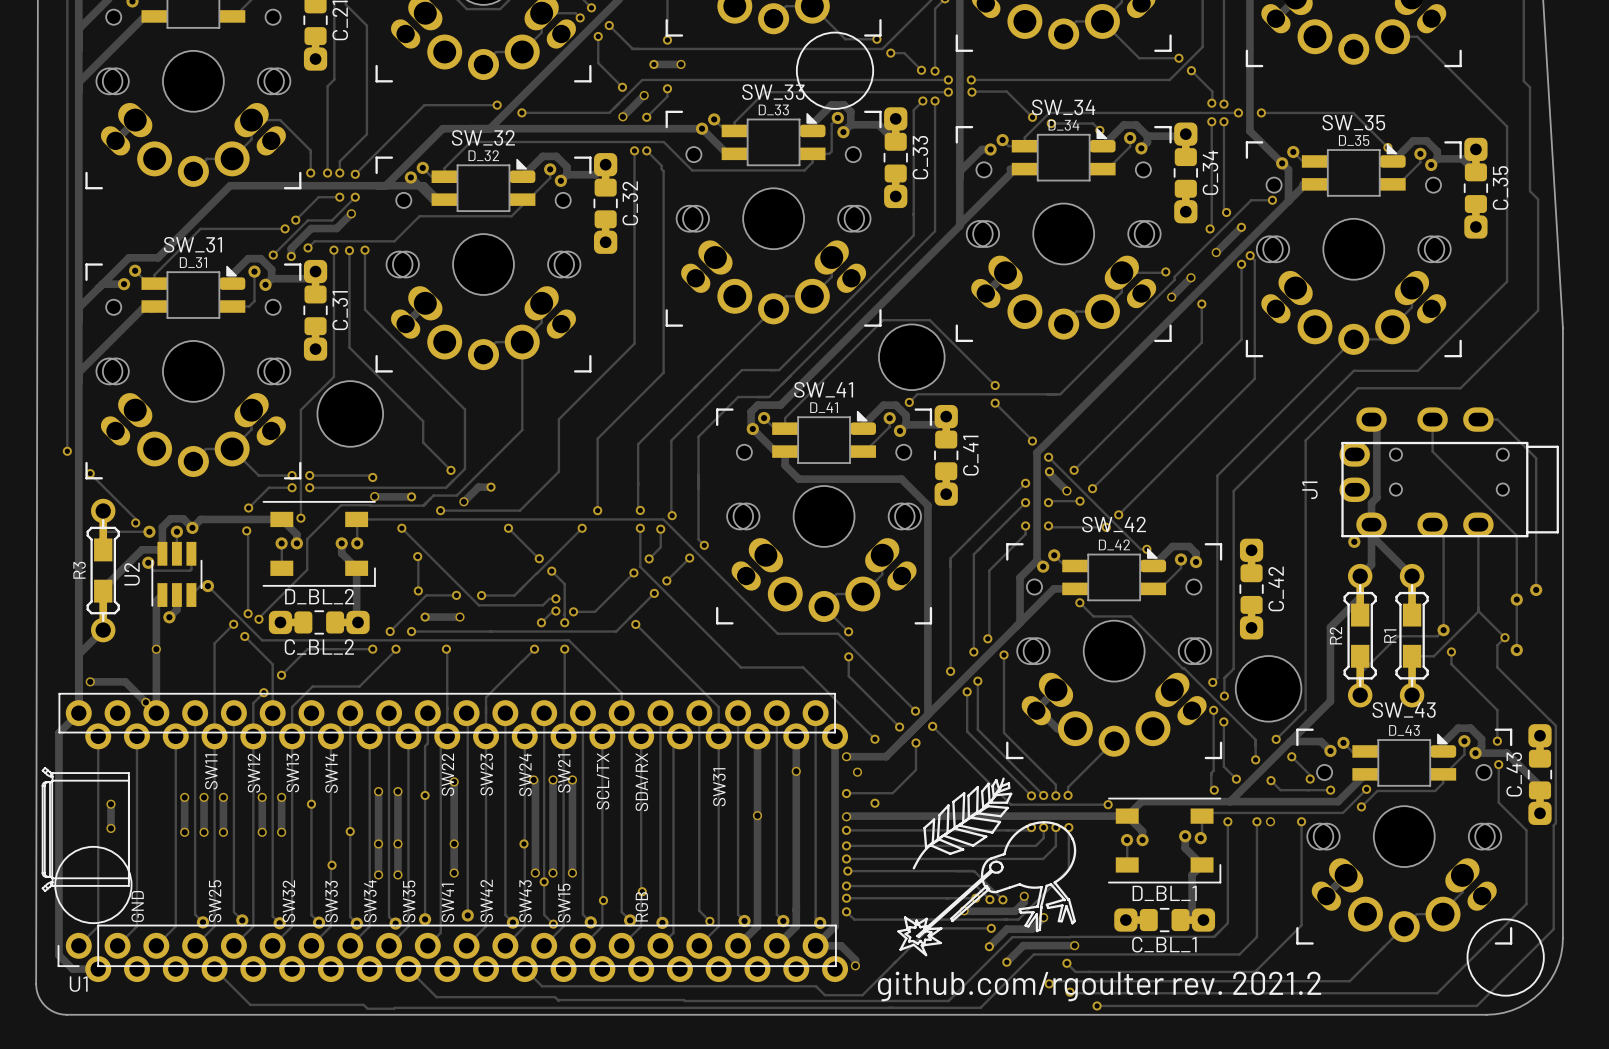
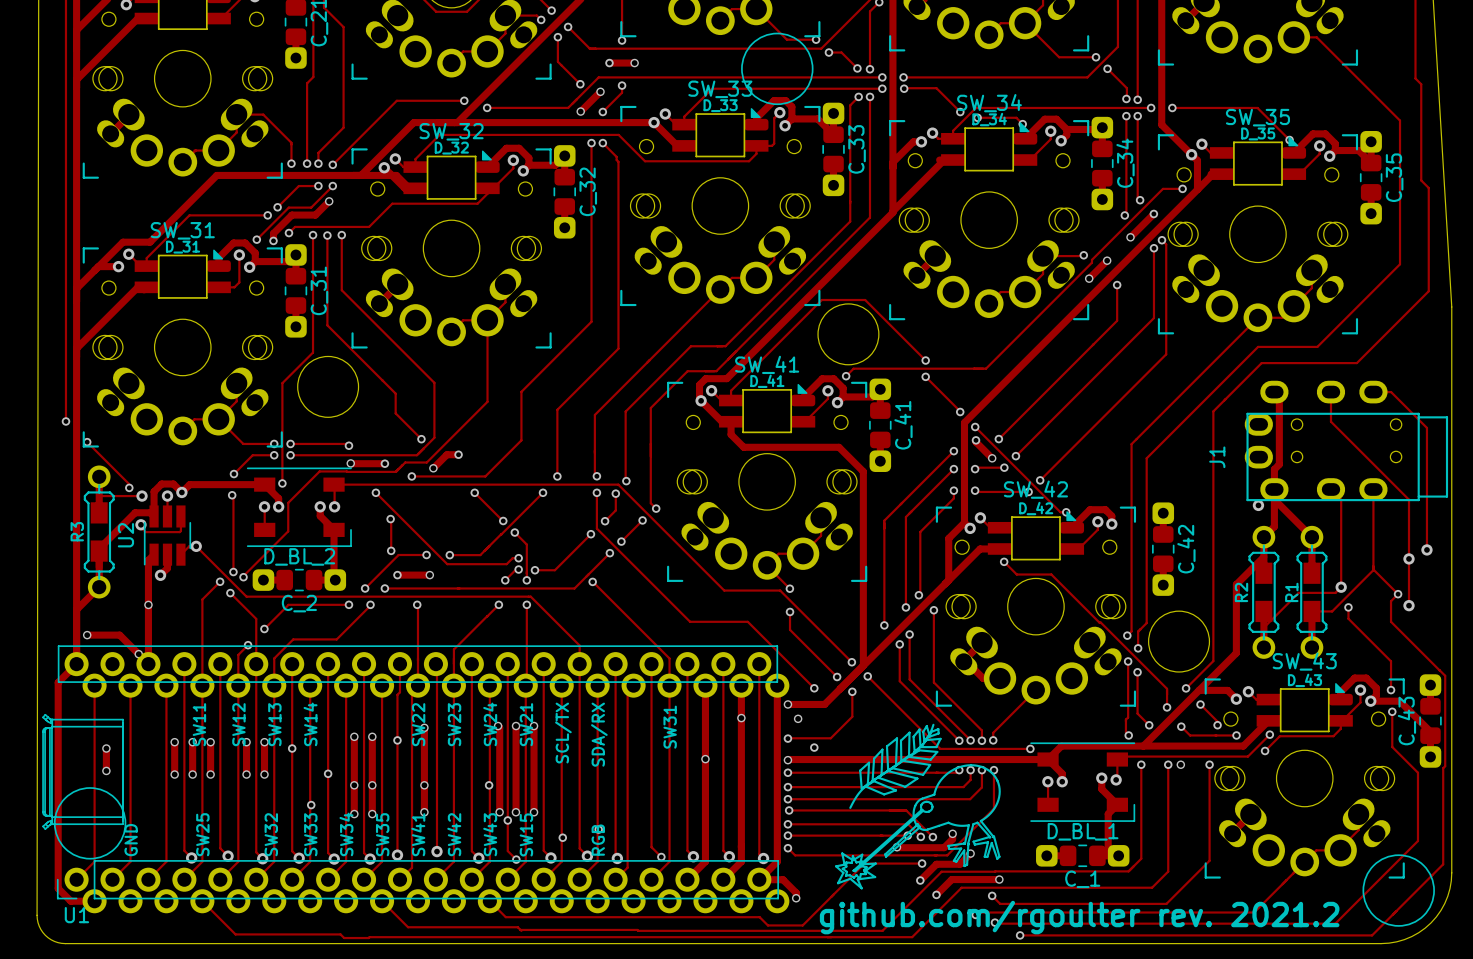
C_BL_2 name: C_BL_2 (319, 647) -> C_2 (299, 603)
C_BL_1 name: C_BL_1 (1164, 944) -> C_1 (1082, 879)

